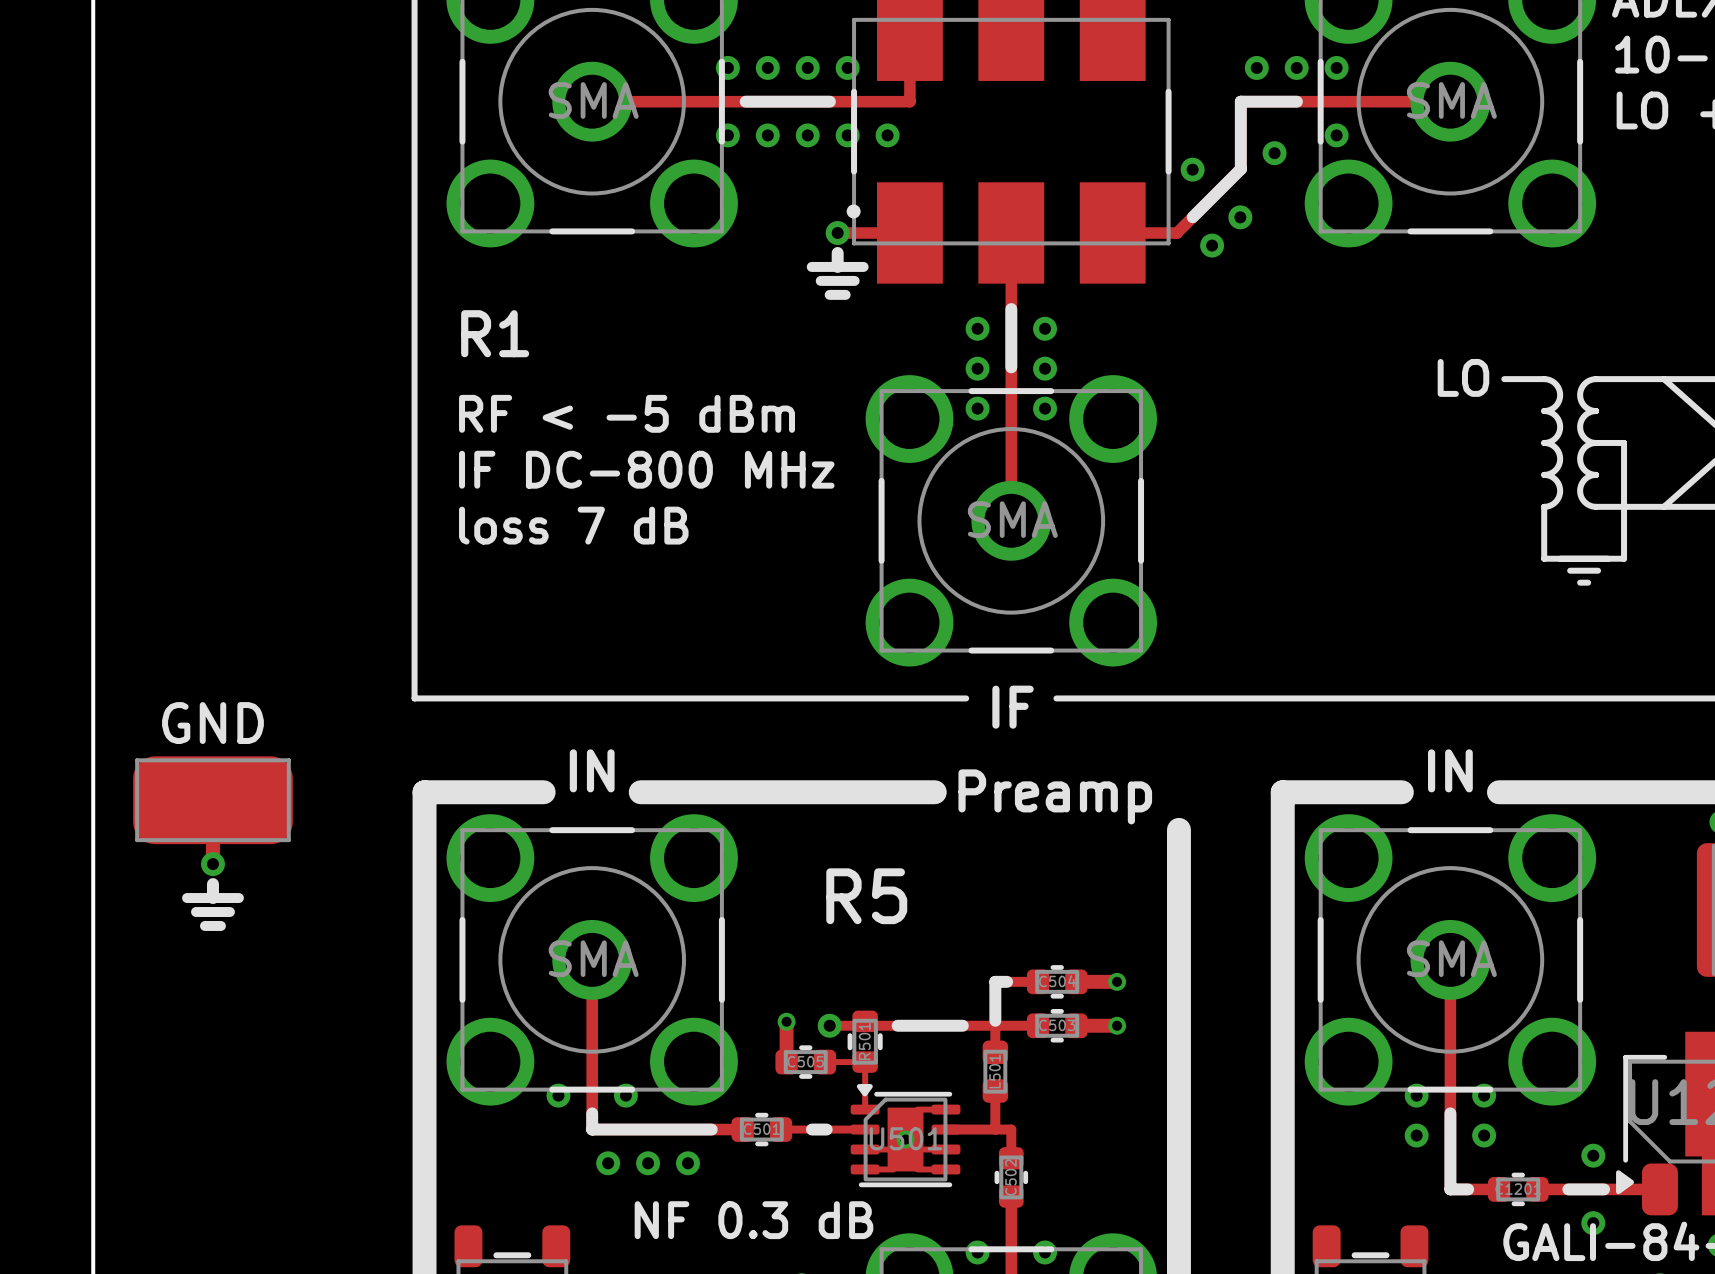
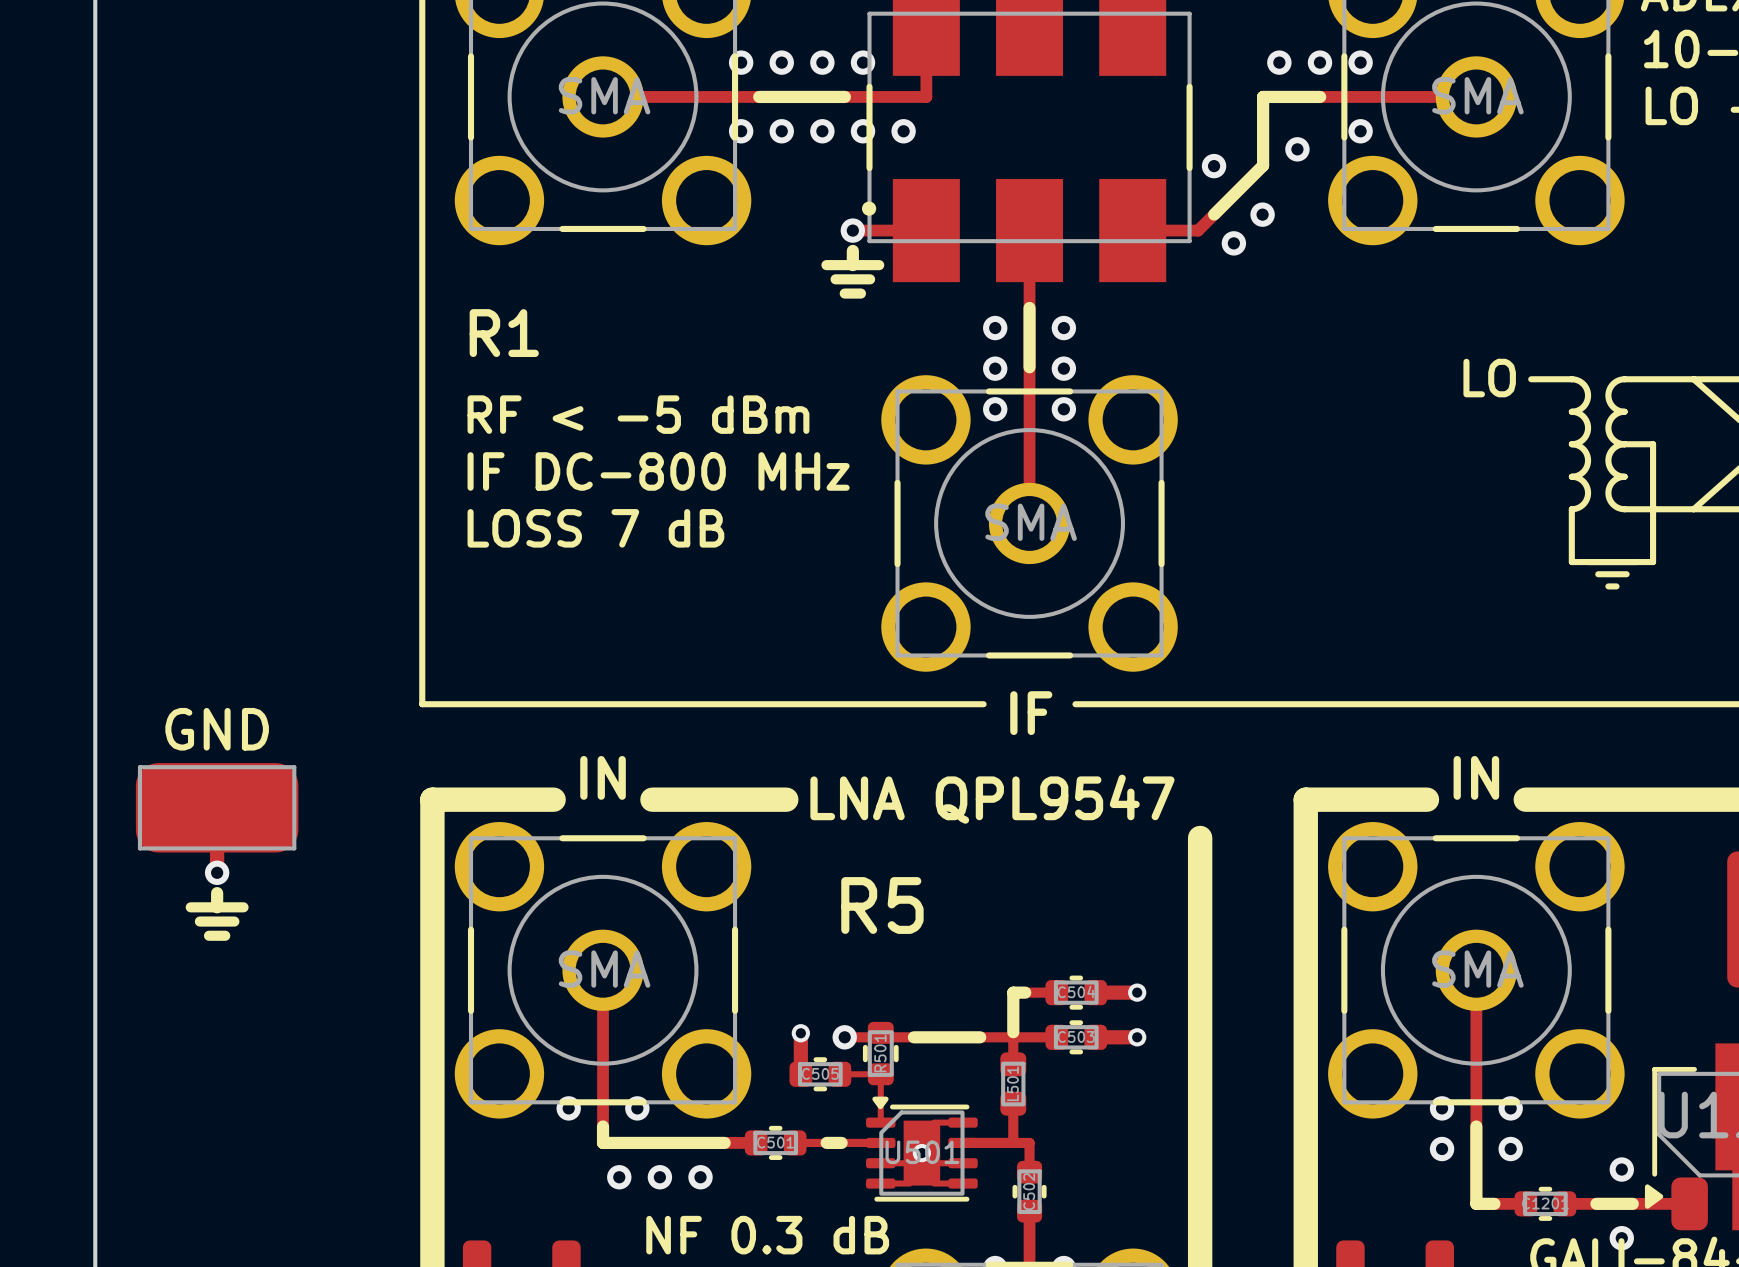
text: loss 7 dB (573, 525) -> LOSS 7 dB (595, 528)
text: none -> LNA QPL9547 (992, 799)
line: (772, 792) (934, 792) -> none
text: Preamp (1055, 796) -> none

